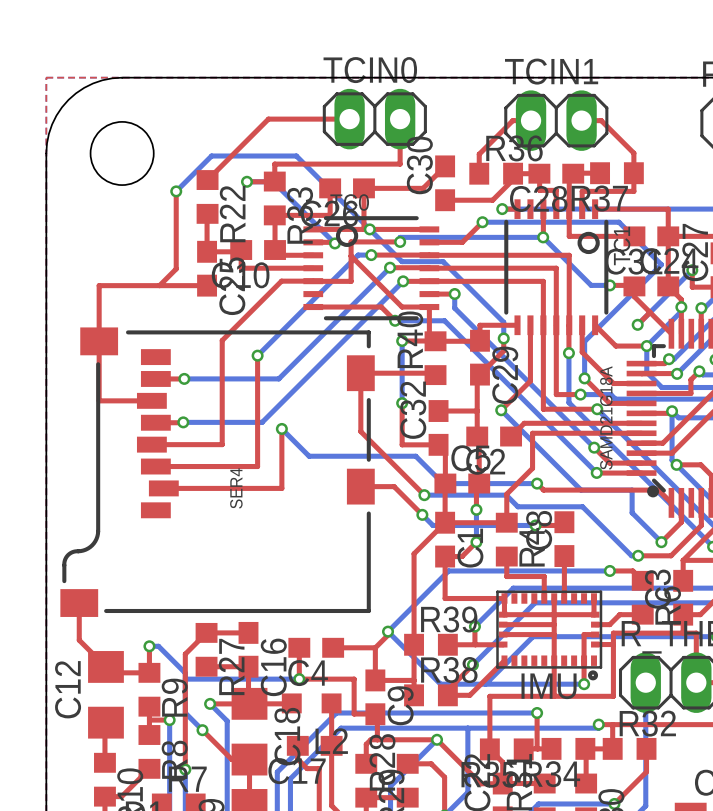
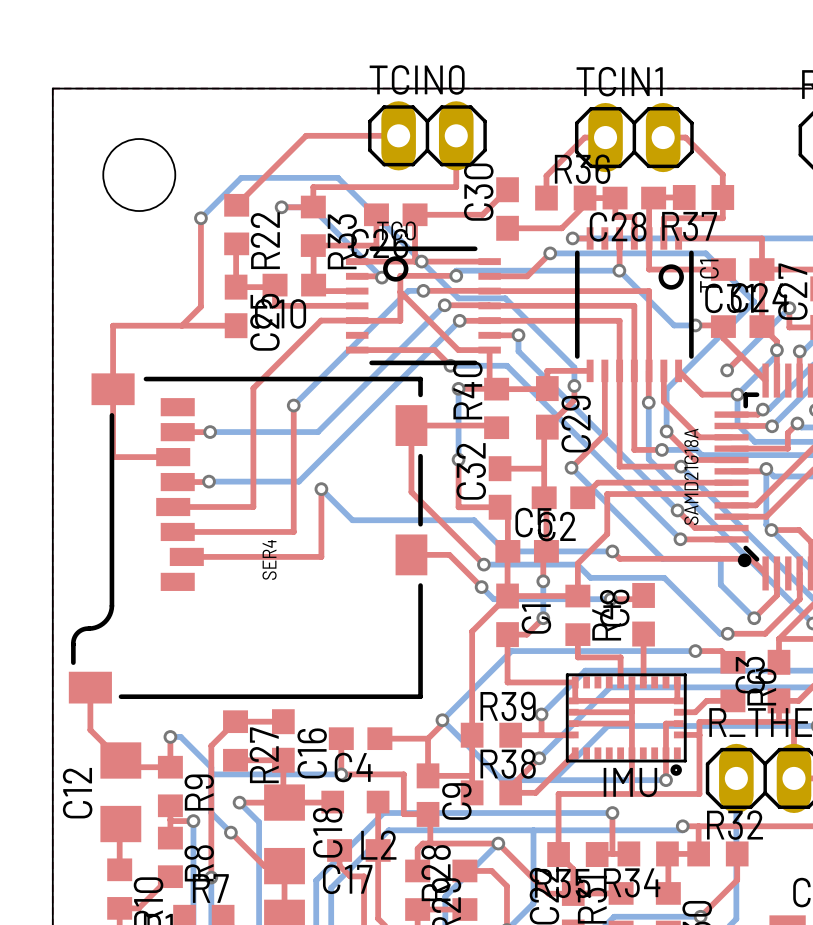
board edge: (122, 77) (93, 83) (68, 99) (52, 124) (46, 153) -> (139, 88) (52, 88) (52, 175)

